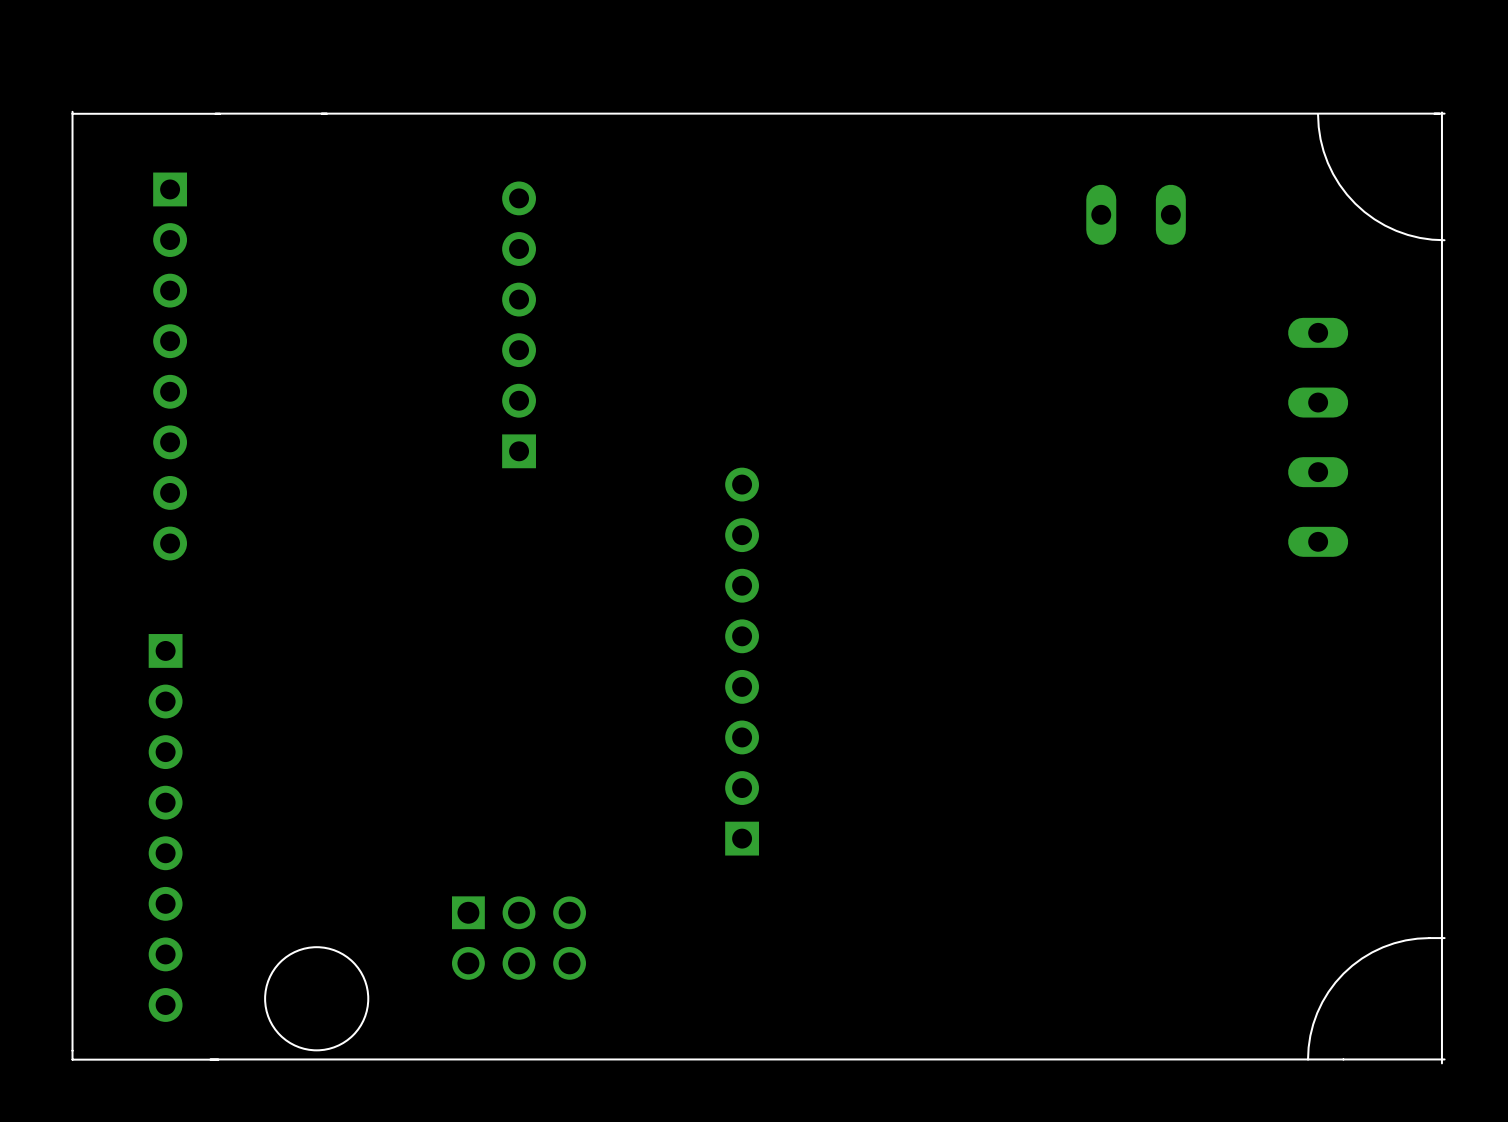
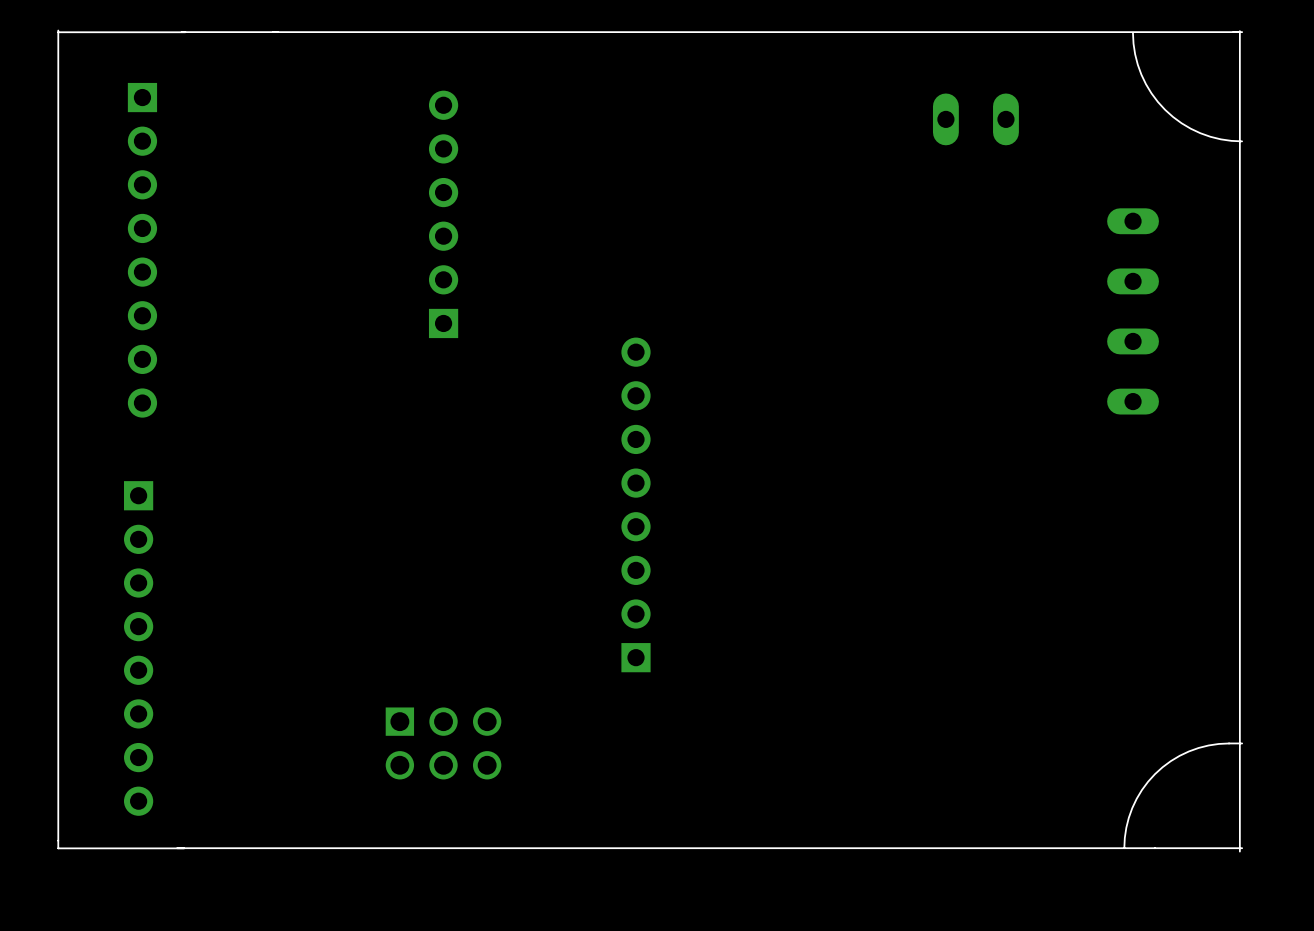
round board edge: [264, 946, 370, 1052] -> none

